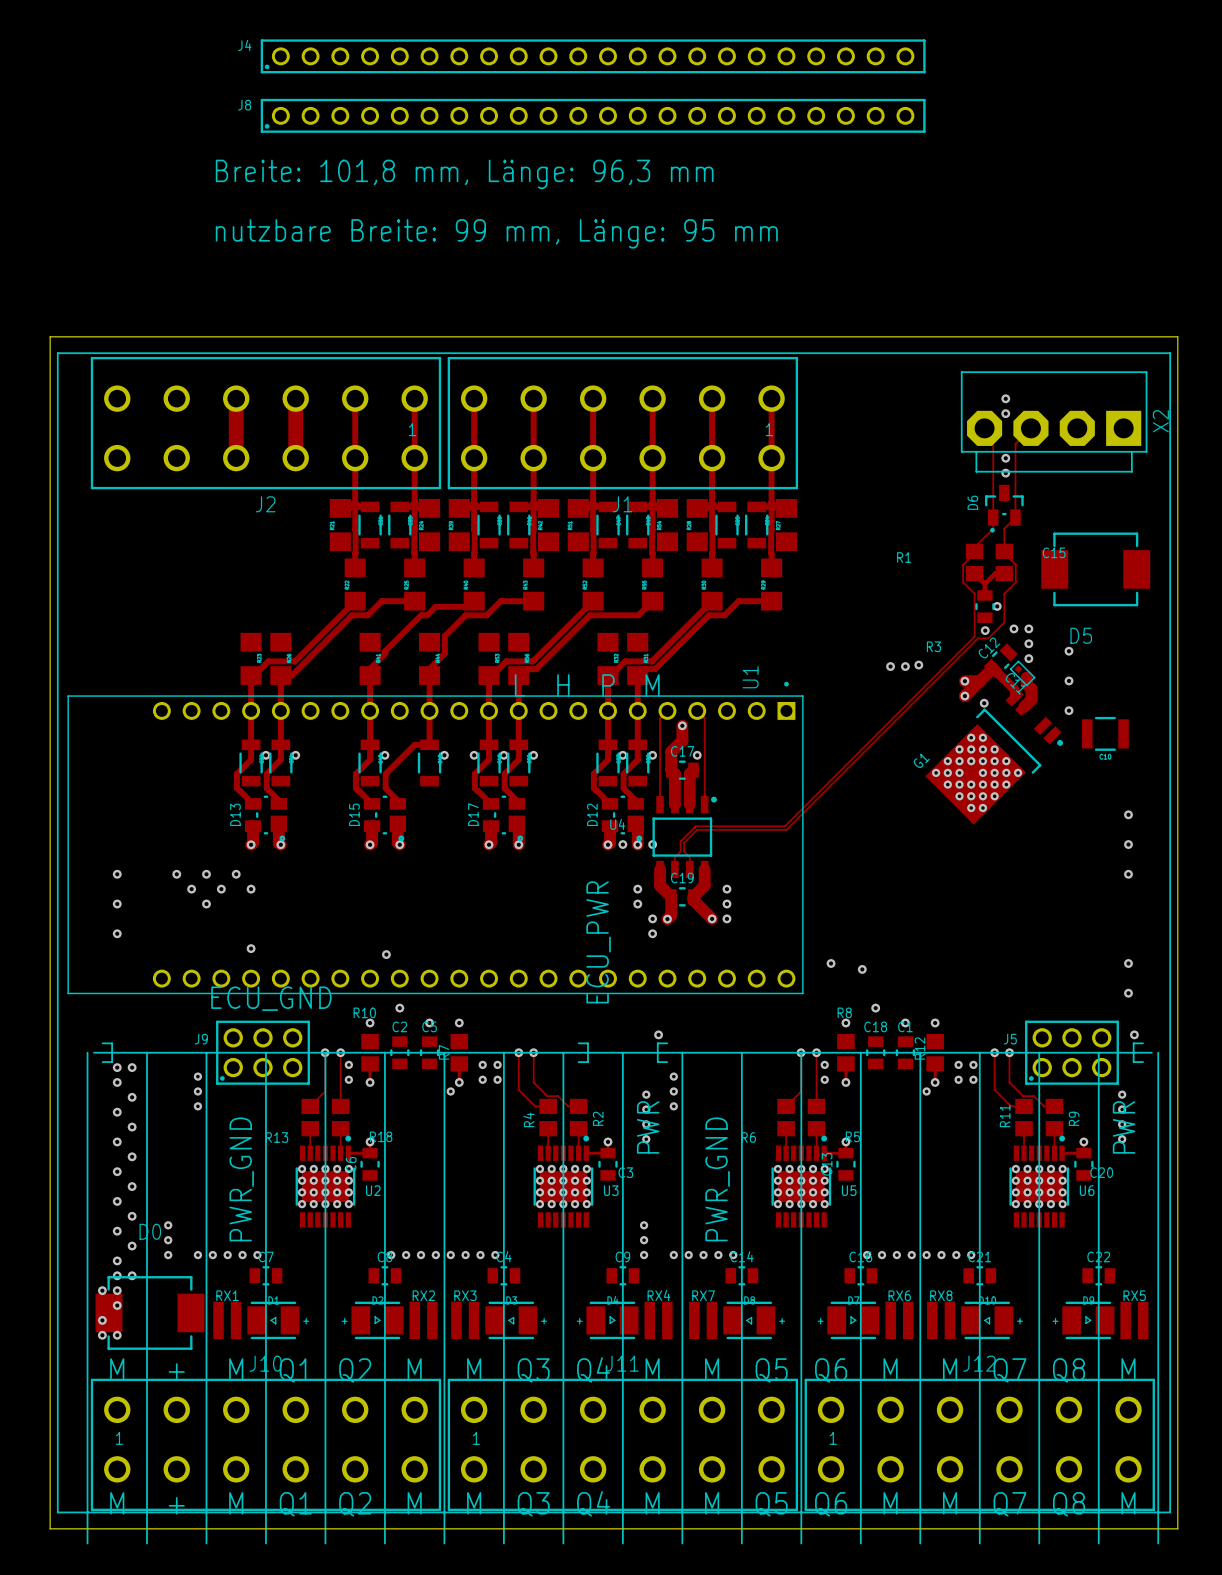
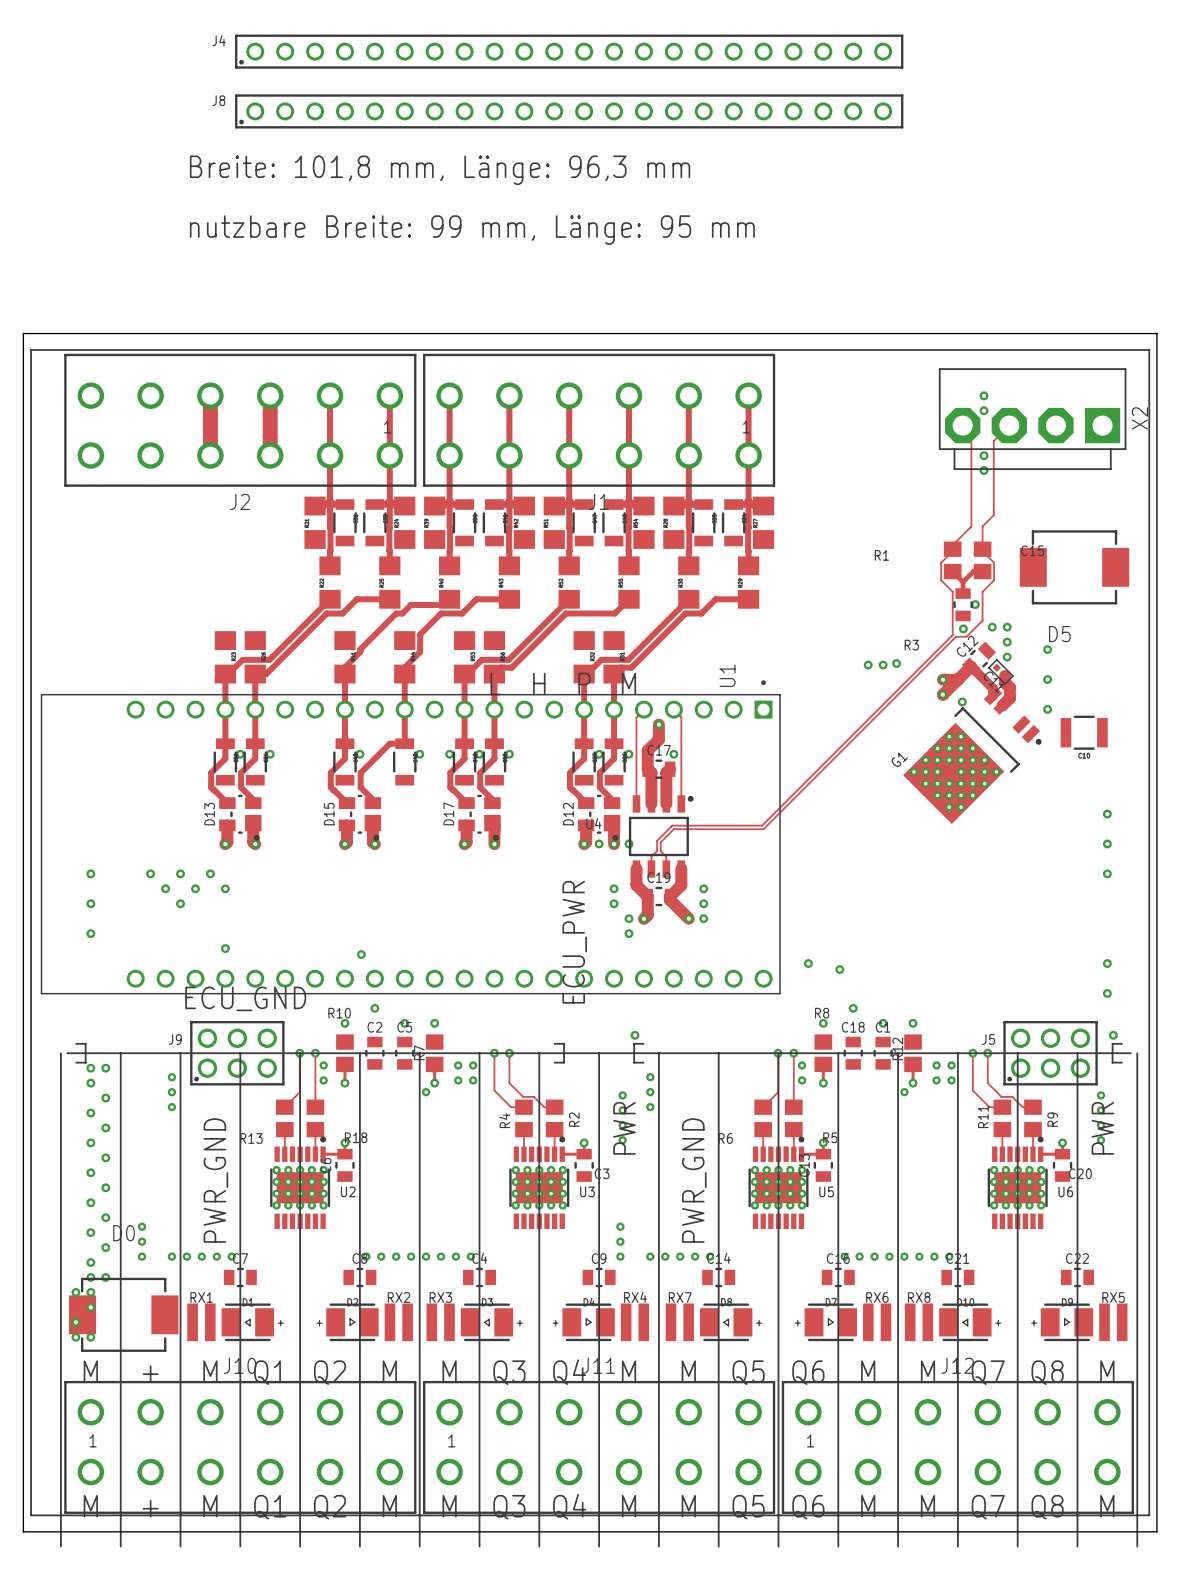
D6: (1004, 508) -> none

